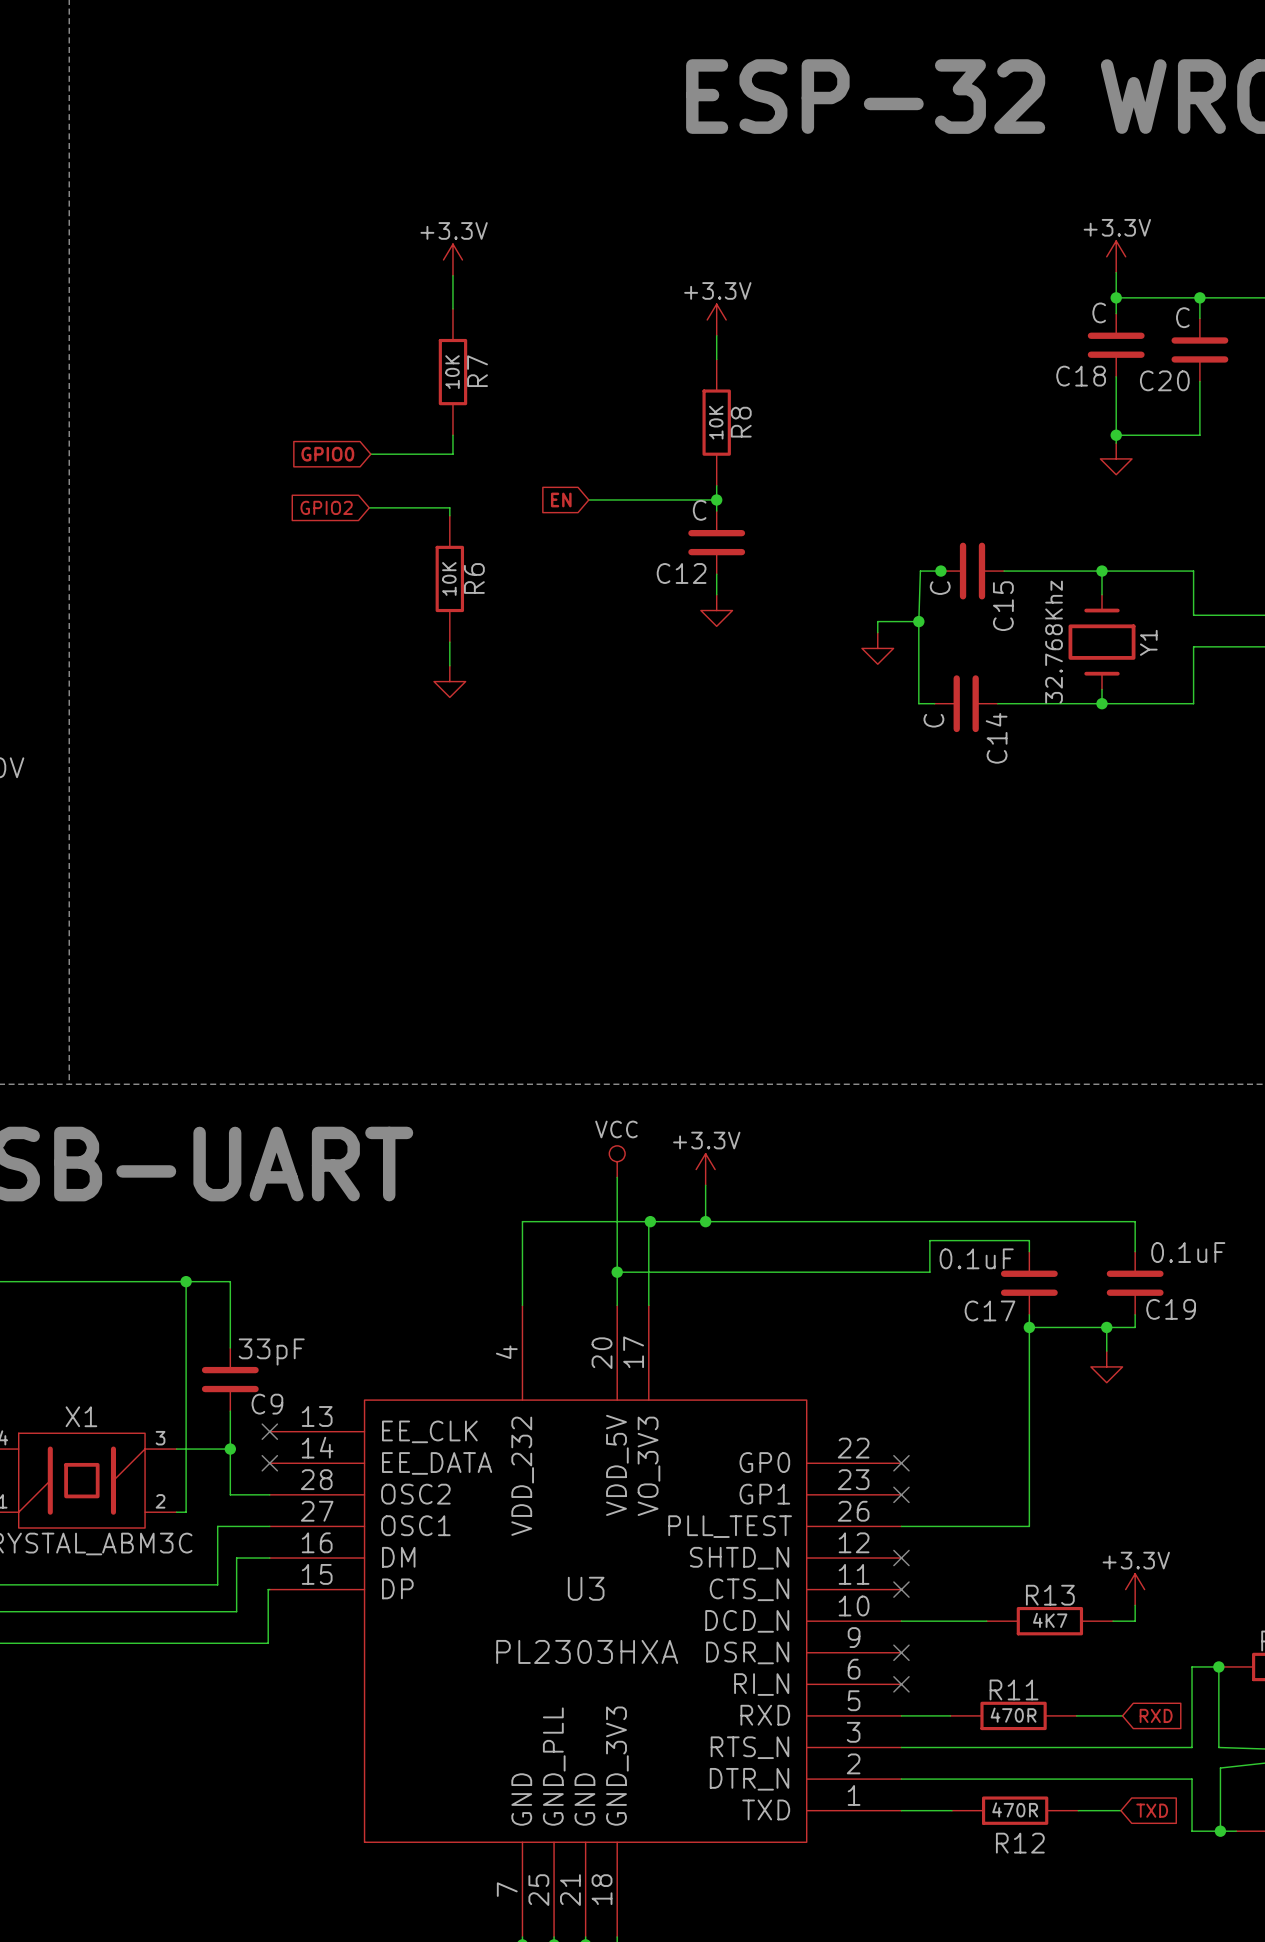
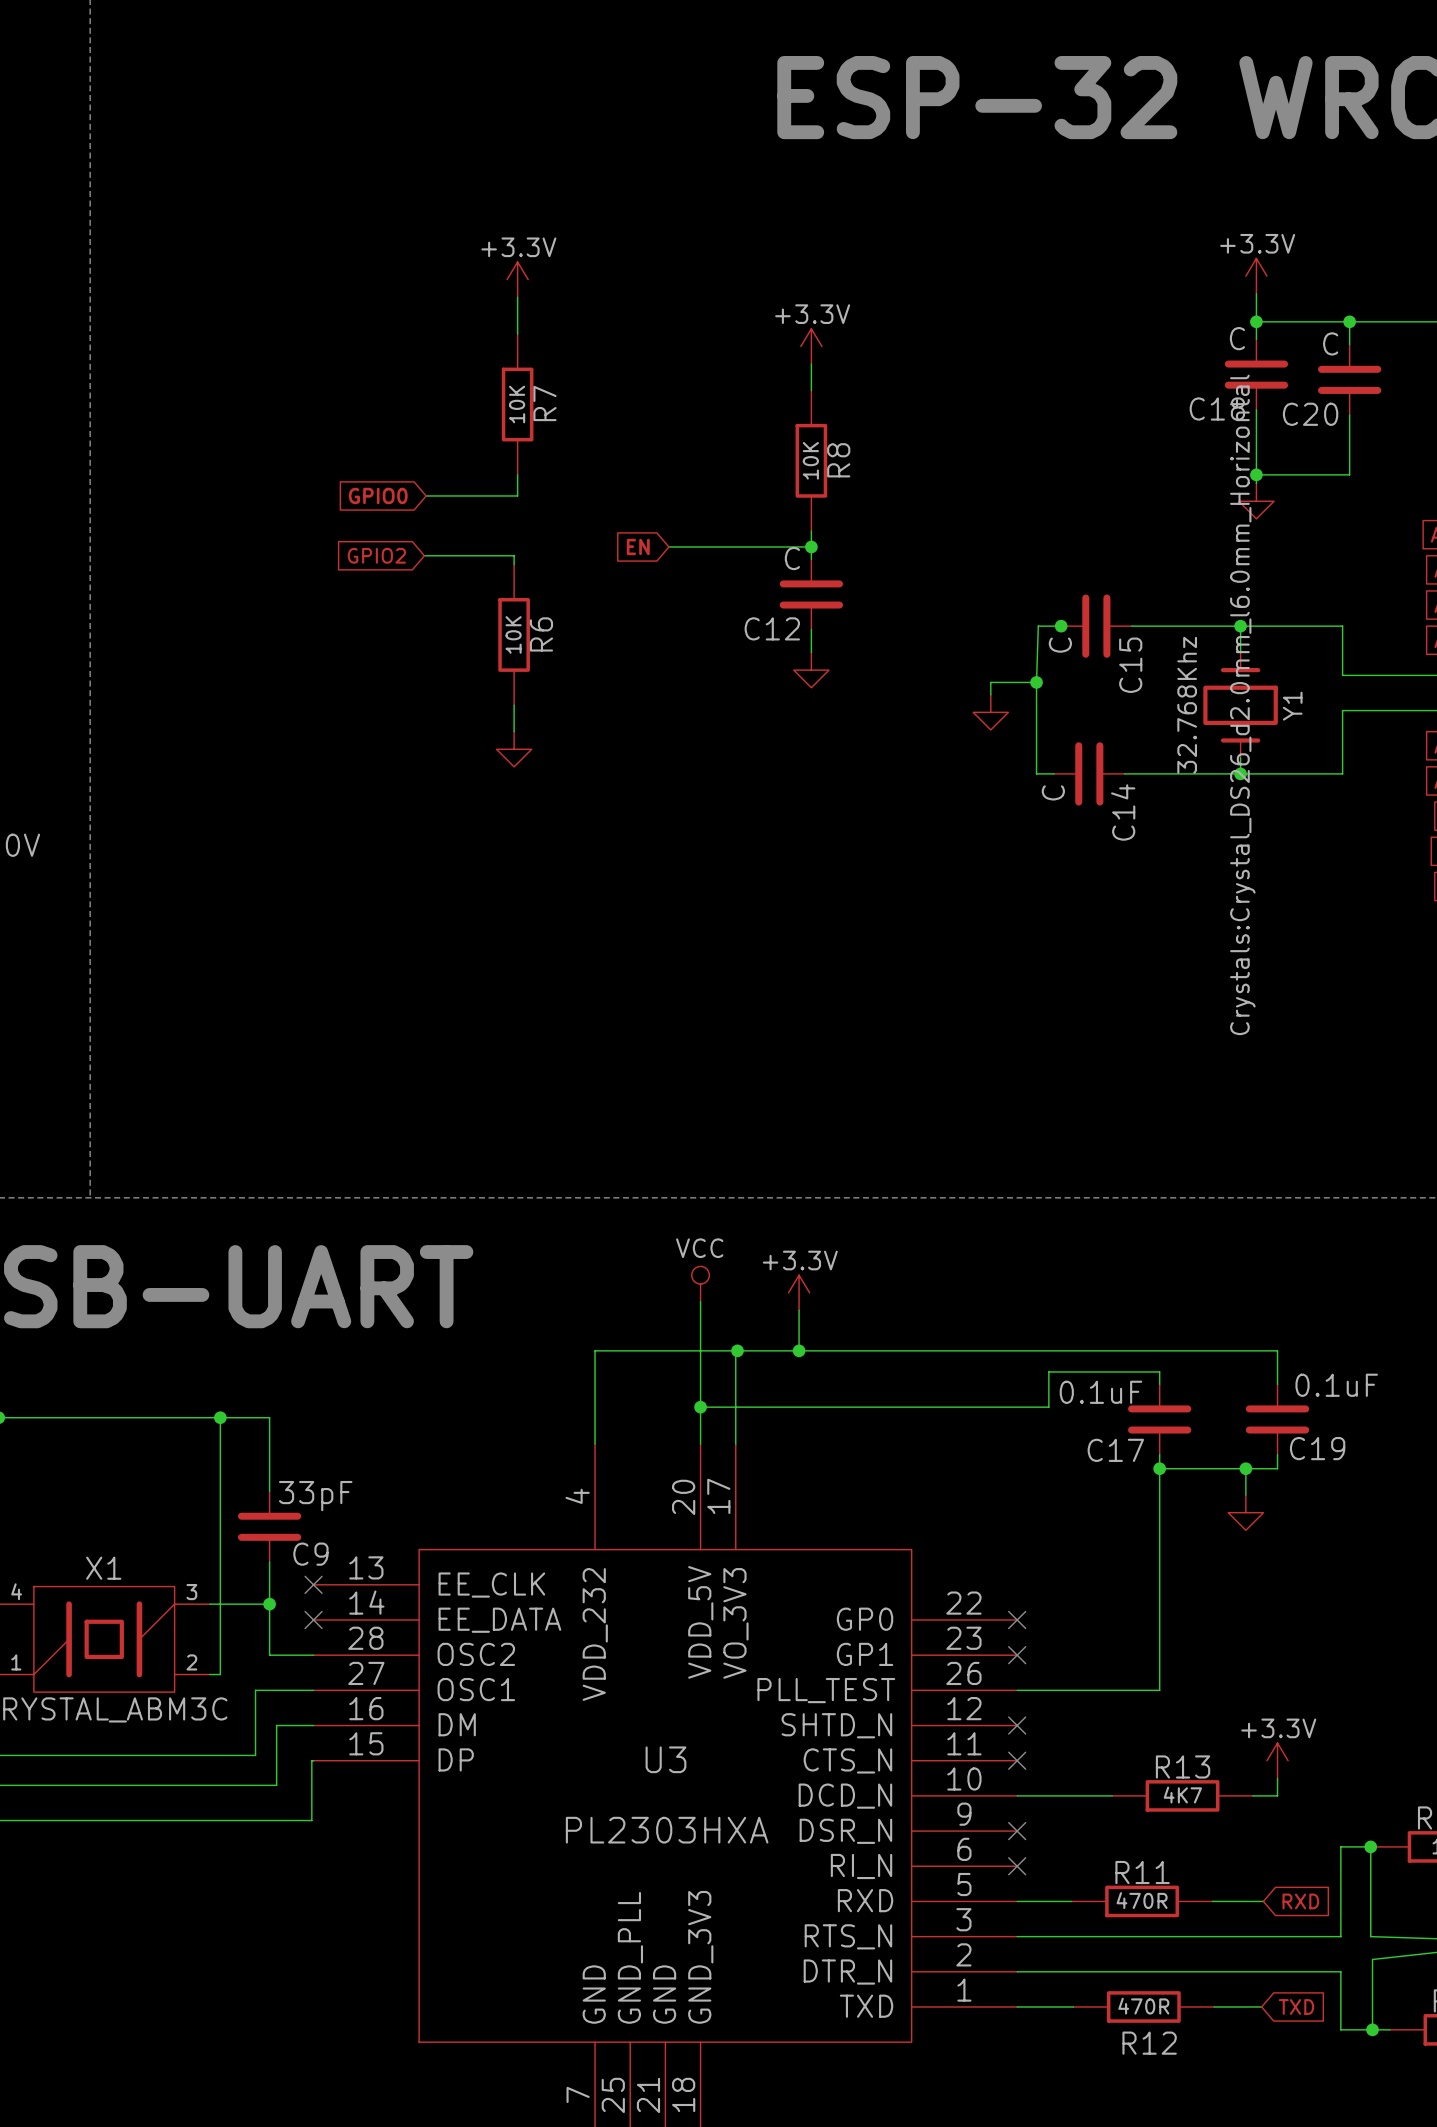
Y1 text: none -> Crystals:Crystal_DS26_d2.0mm_l6.0mm_Horizontal (1242, 704)

